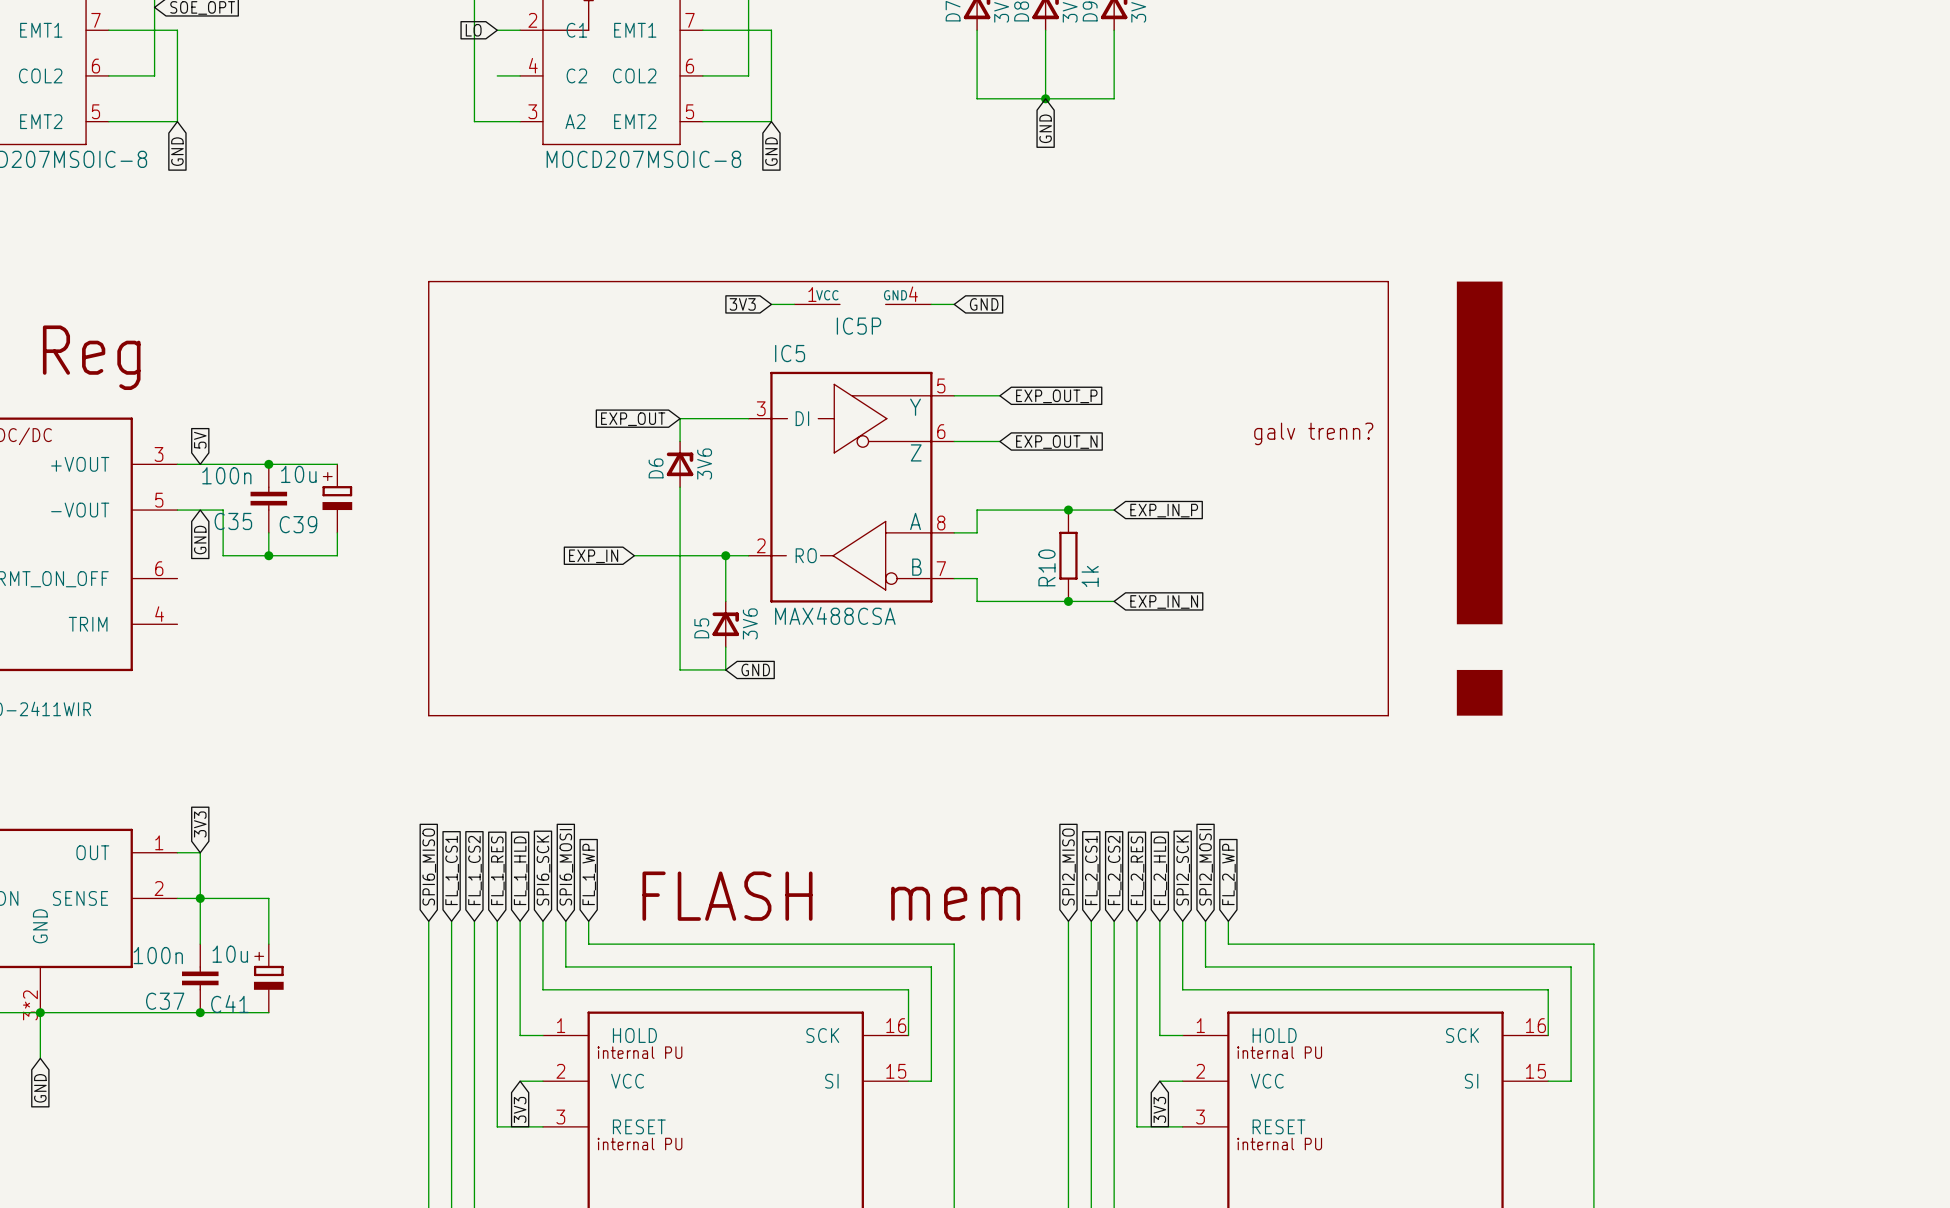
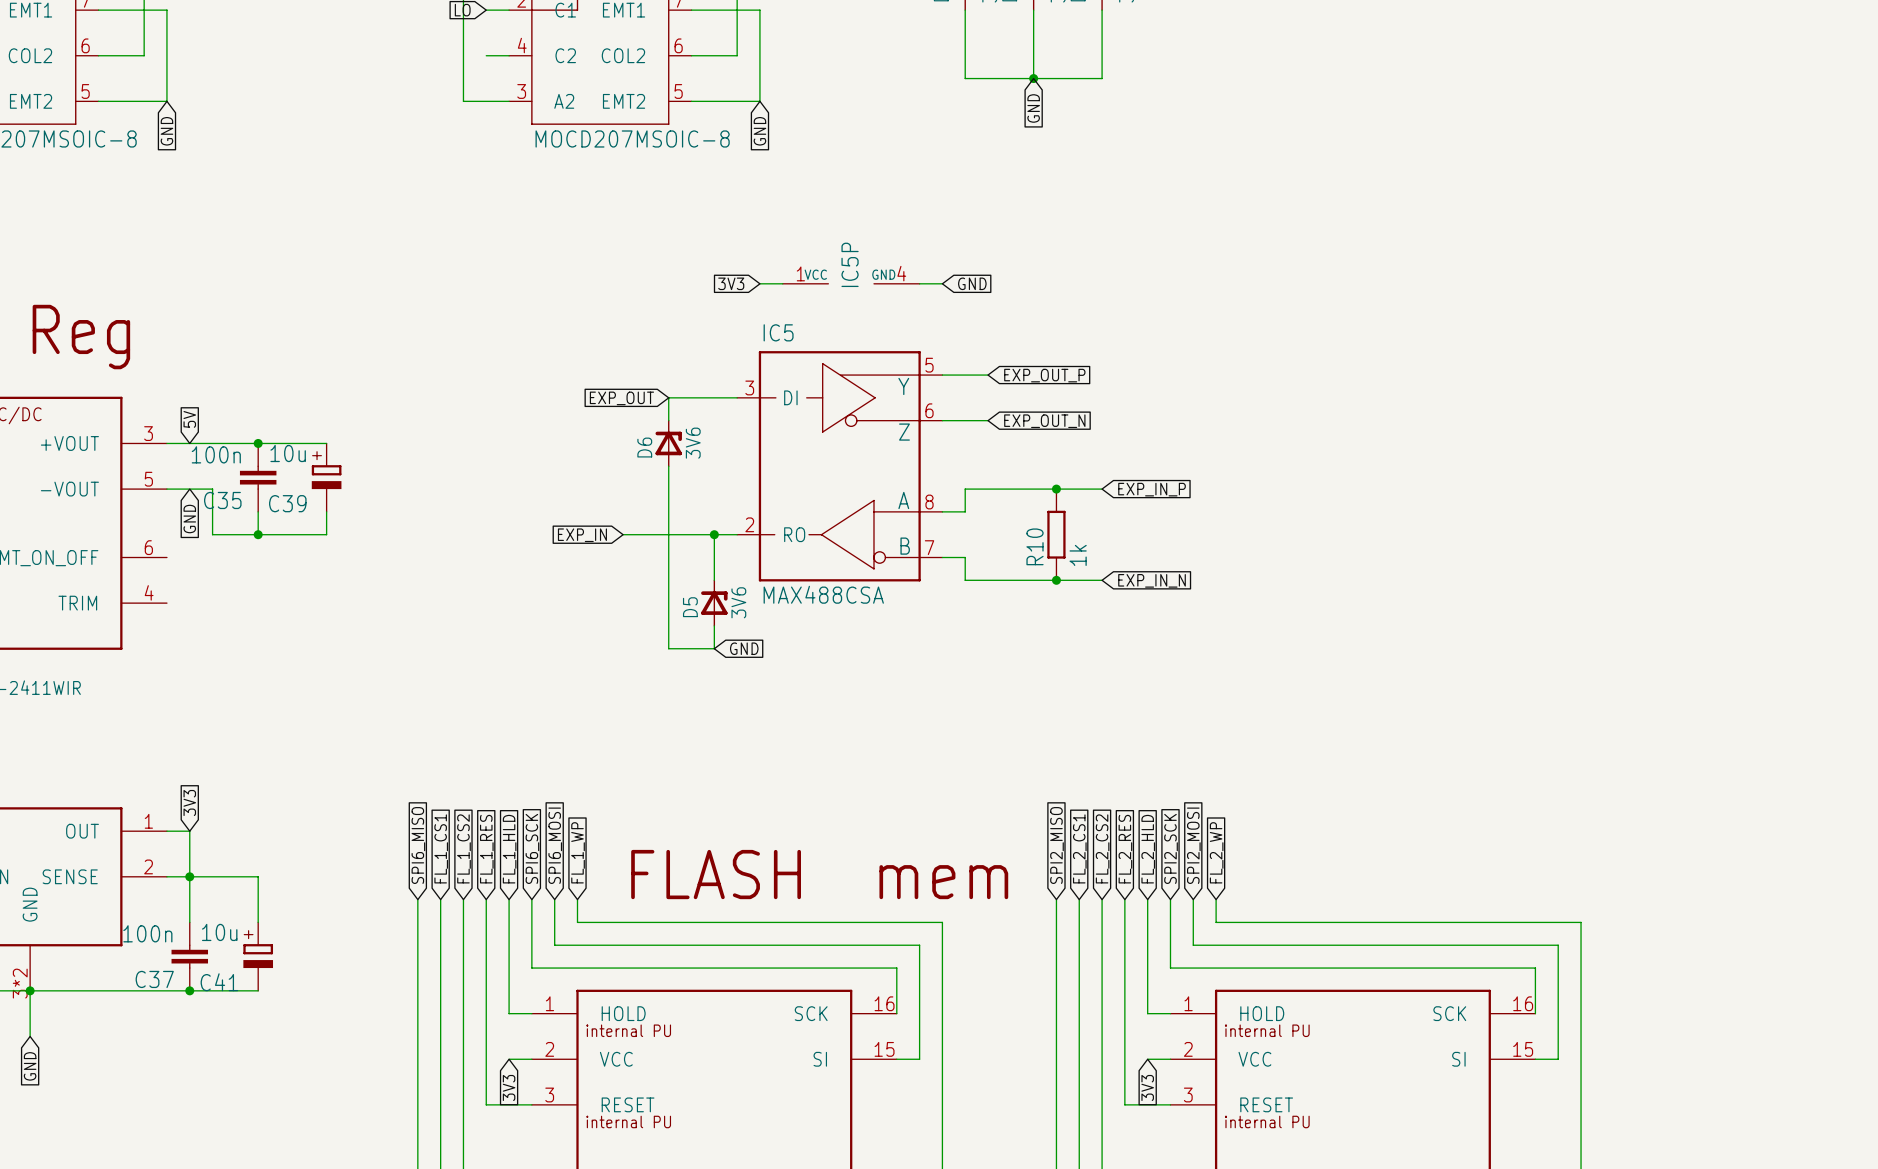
line: (428, 281) (428, 715) (1388, 715) (1388, 281) (428, 281) -> none
drawing: [1456, 281, 1503, 625] -> none
IC5P name rotation: 0° (858, 326) -> 90° counterclockwise (850, 264)
text: galv trenn? (1313, 433) -> none
drawing: [1456, 669, 1503, 716] -> none

